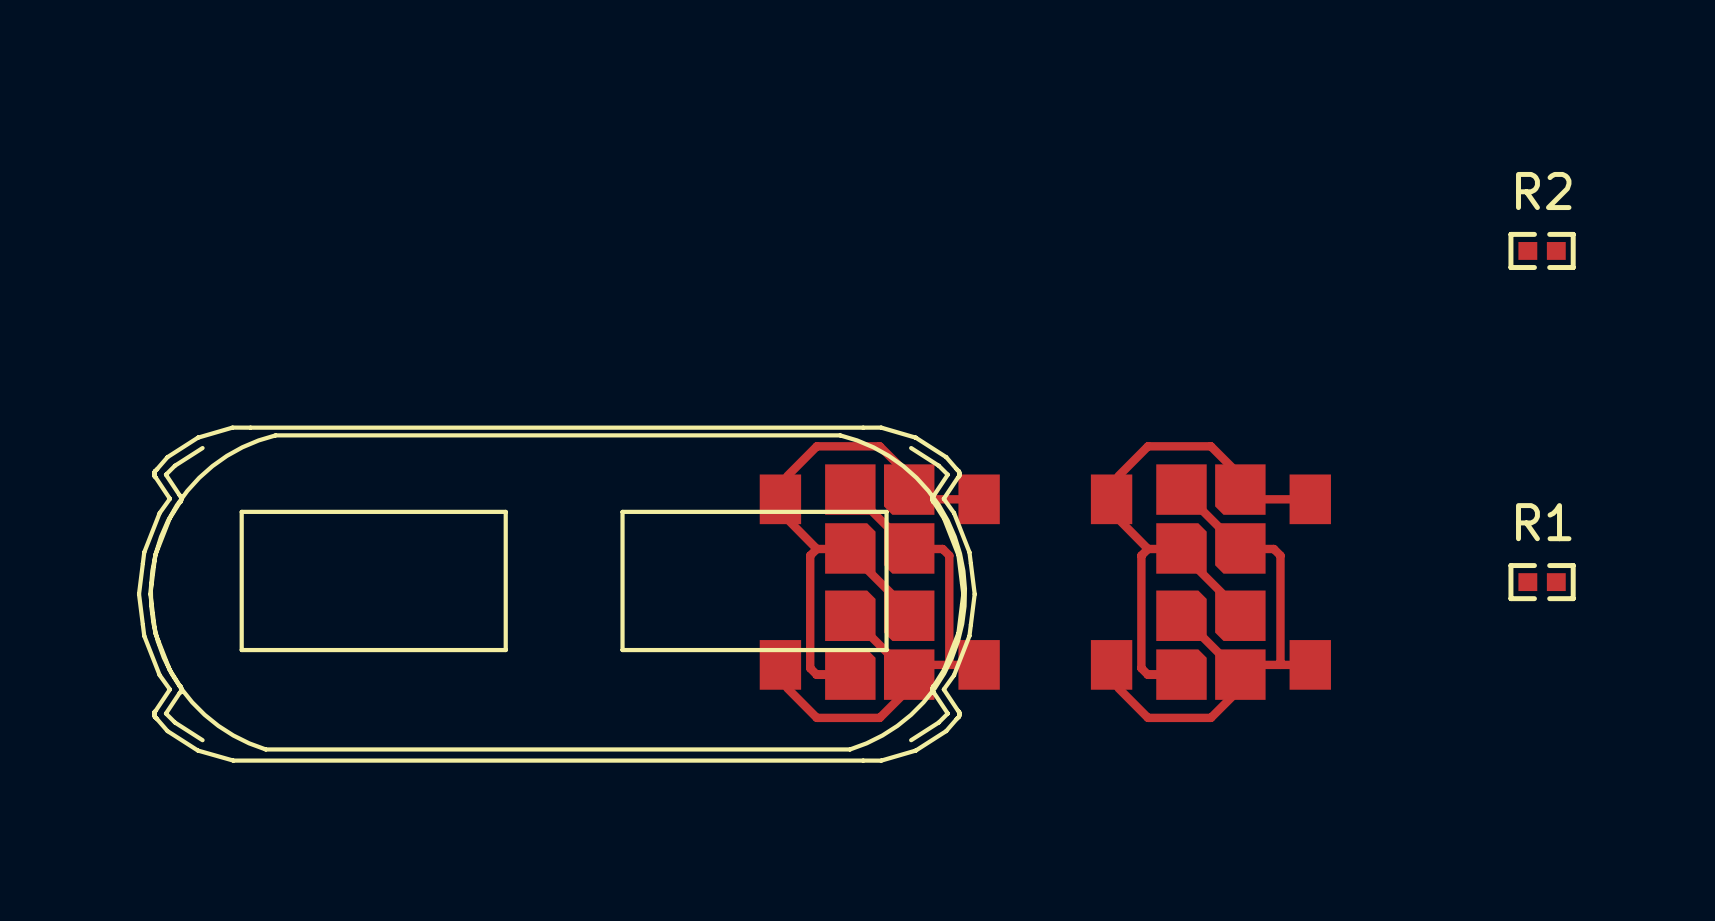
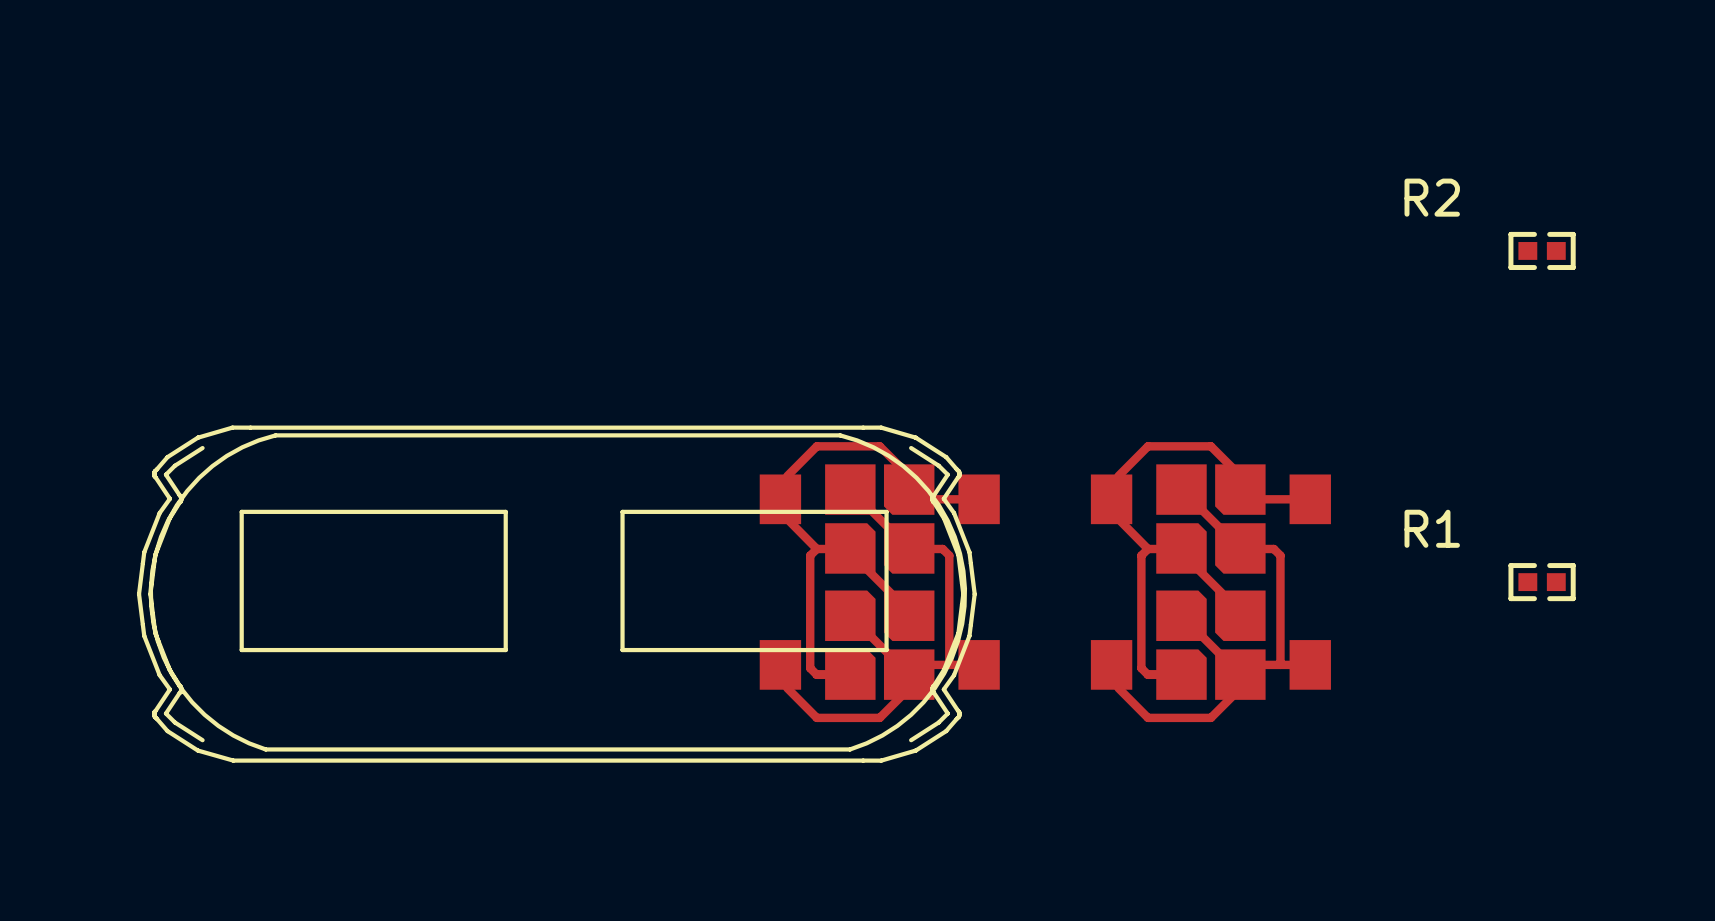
R2 name position: R2 (1543, 190) -> R2 (1432, 197)
R1 name position: R1 (1543, 522) -> R1 (1432, 528)

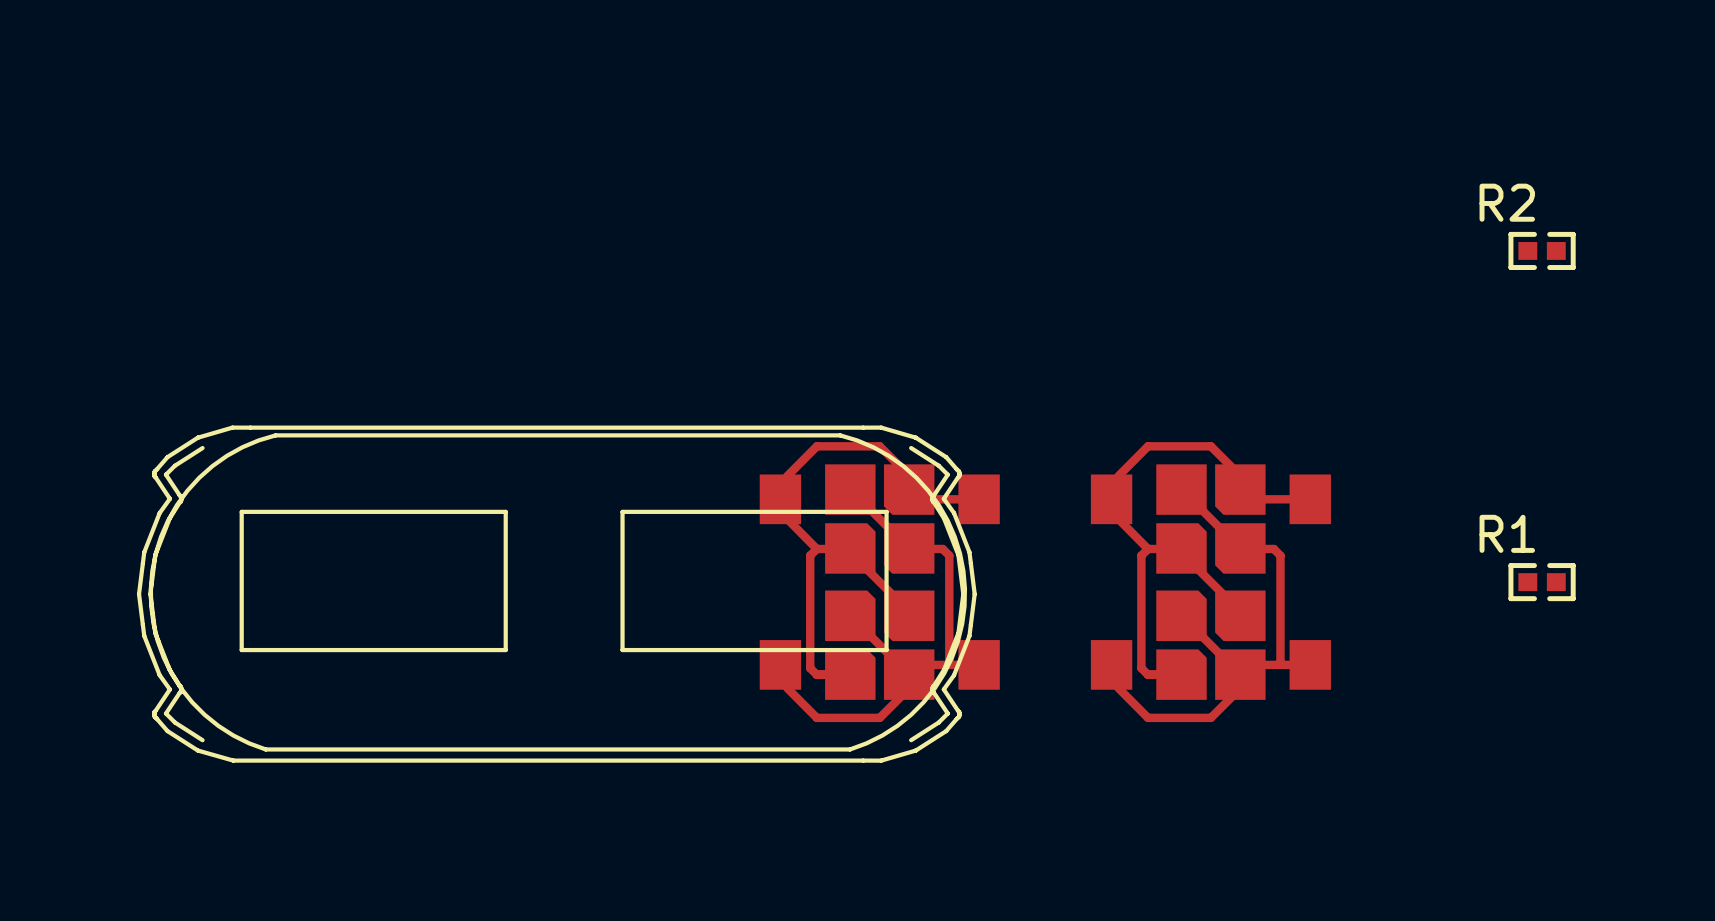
R2 name position: R2 (1432, 197) -> R2 (1507, 202)
R1 name position: R1 (1432, 528) -> R1 (1507, 533)

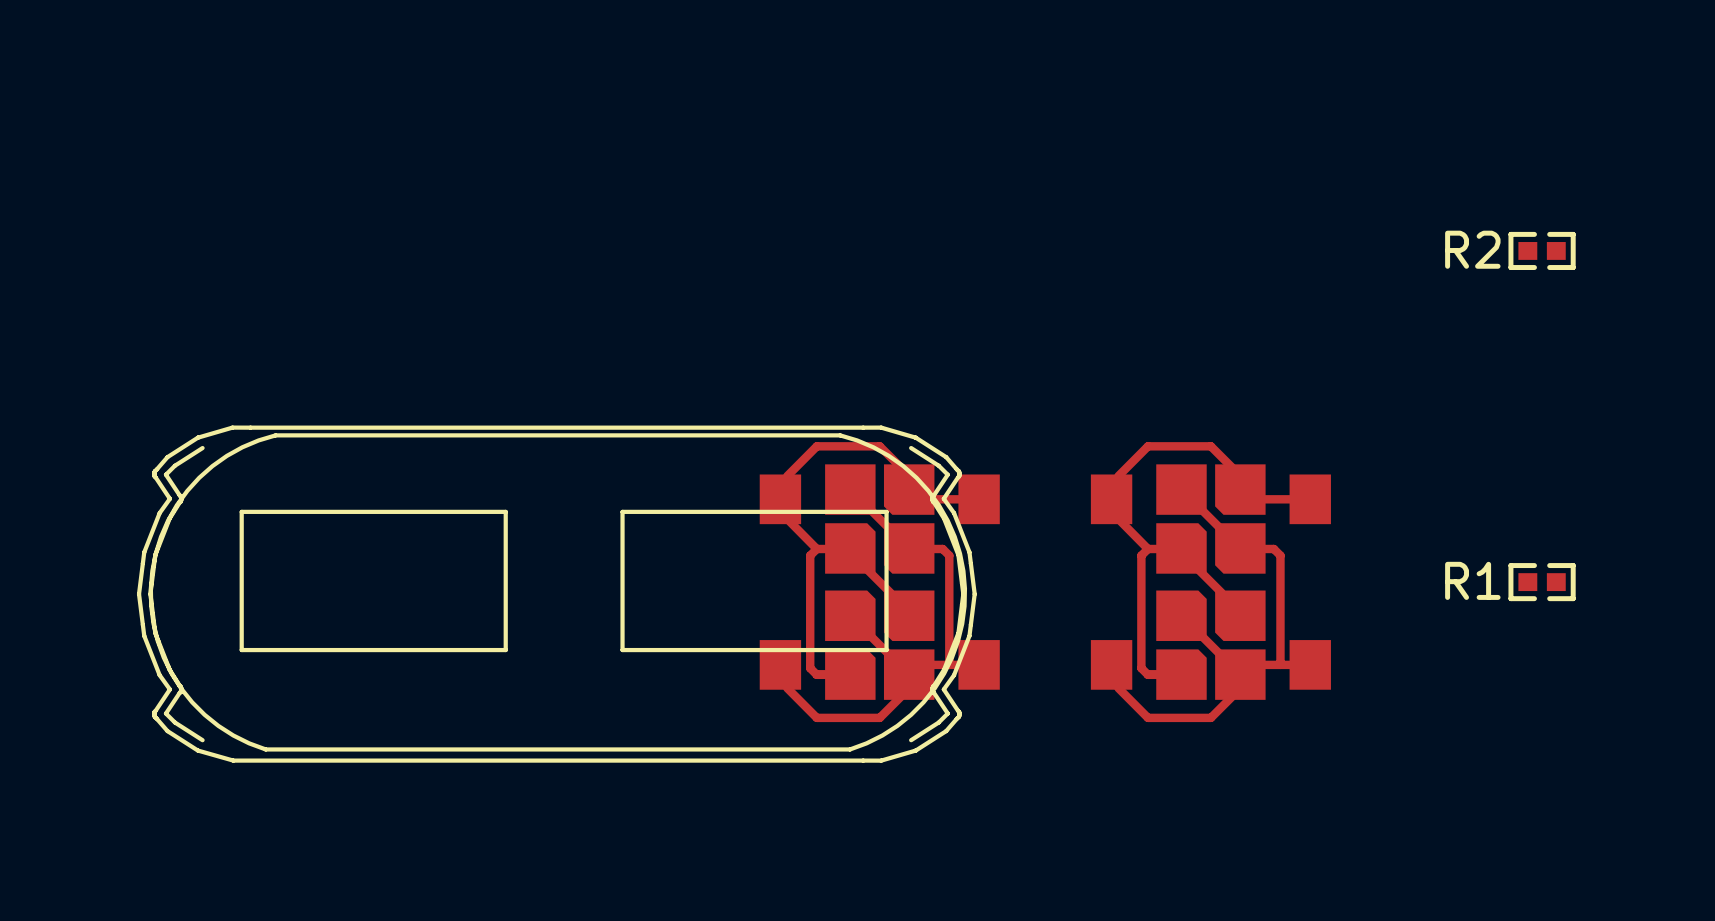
R2 name position: R2 (1507, 202) -> R2 (1472, 249)
R1 name position: R1 (1507, 533) -> R1 (1472, 580)

